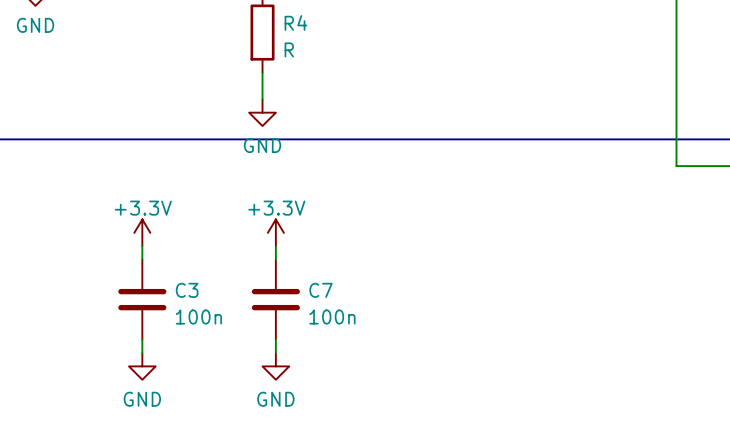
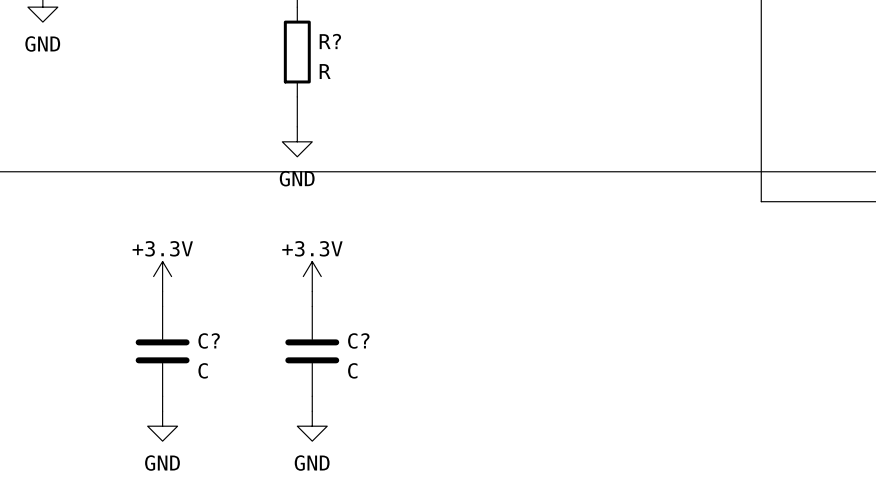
R4 name: R4 (295, 22) -> R? (330, 41)
C3 name: C3 (187, 290) -> C? (209, 340)
C7 name: C7 (320, 290) -> C? (358, 340)
C3 value: 100n (198, 317) -> C (203, 370)
C7 value: 100n (332, 317) -> C (352, 370)

